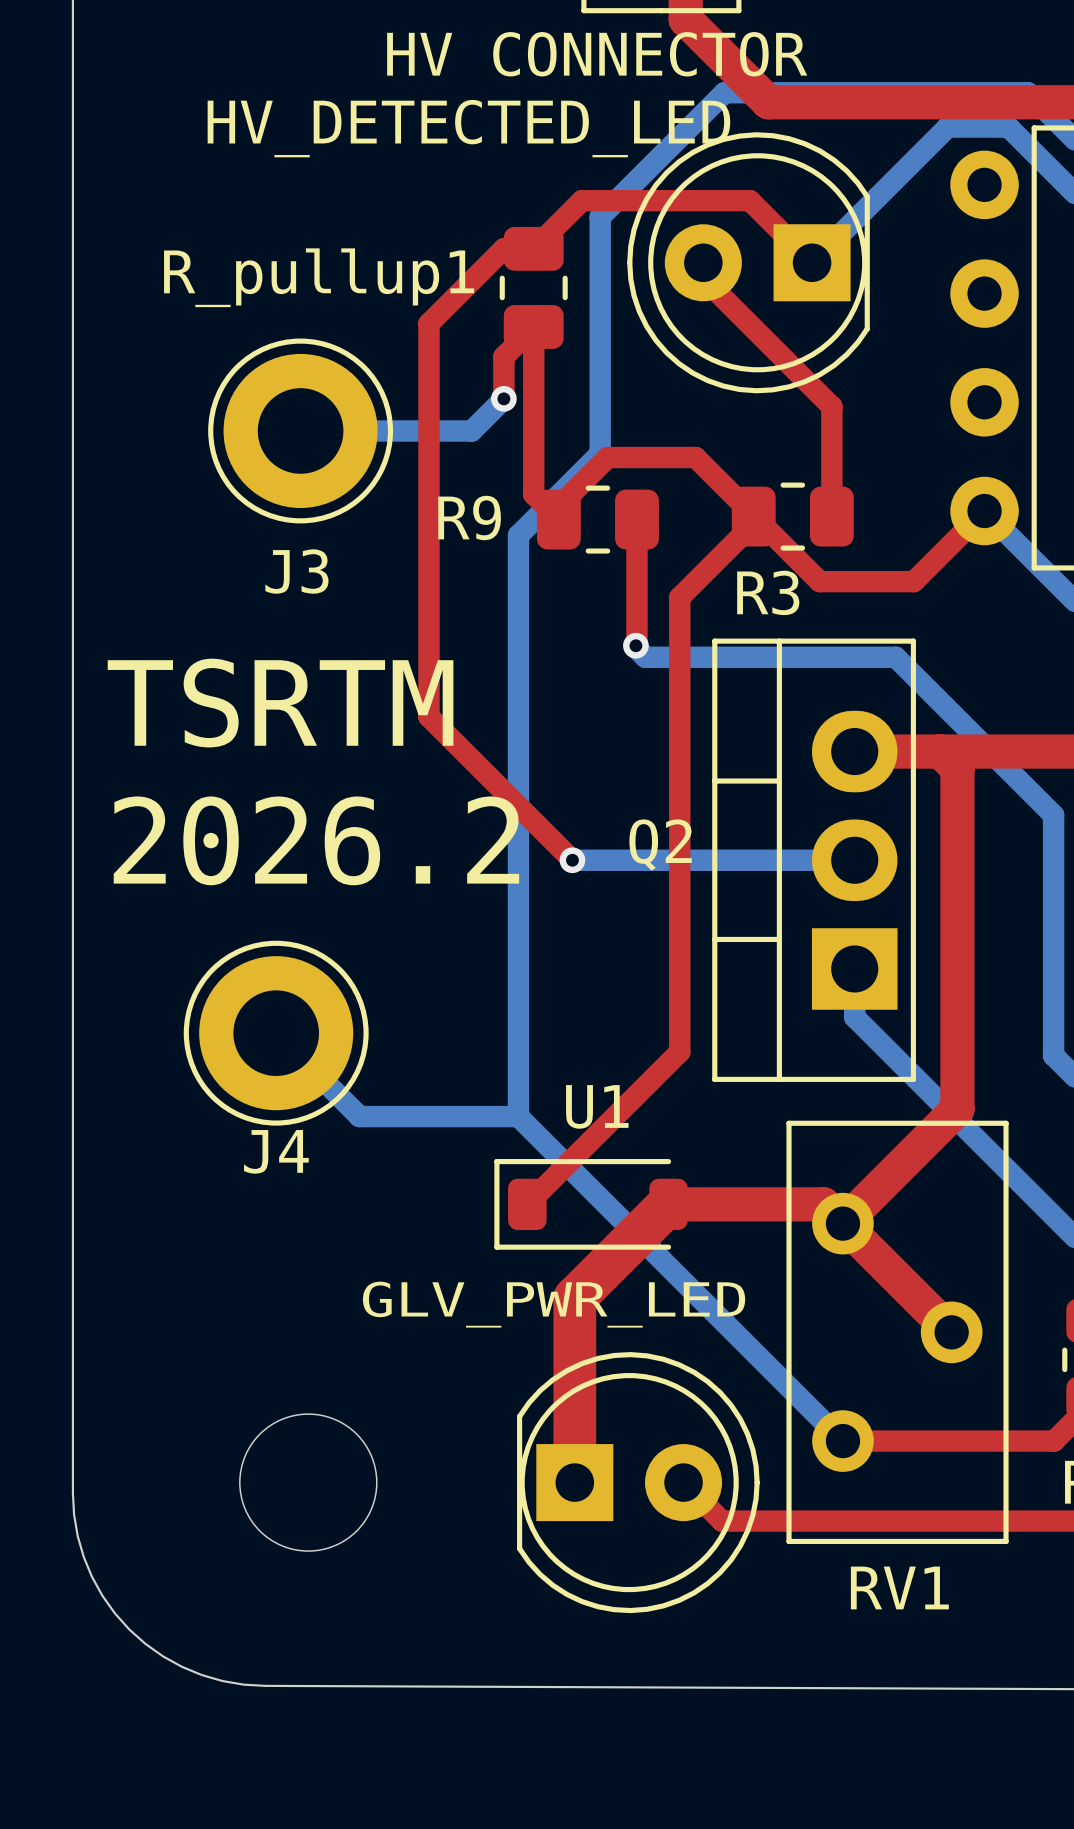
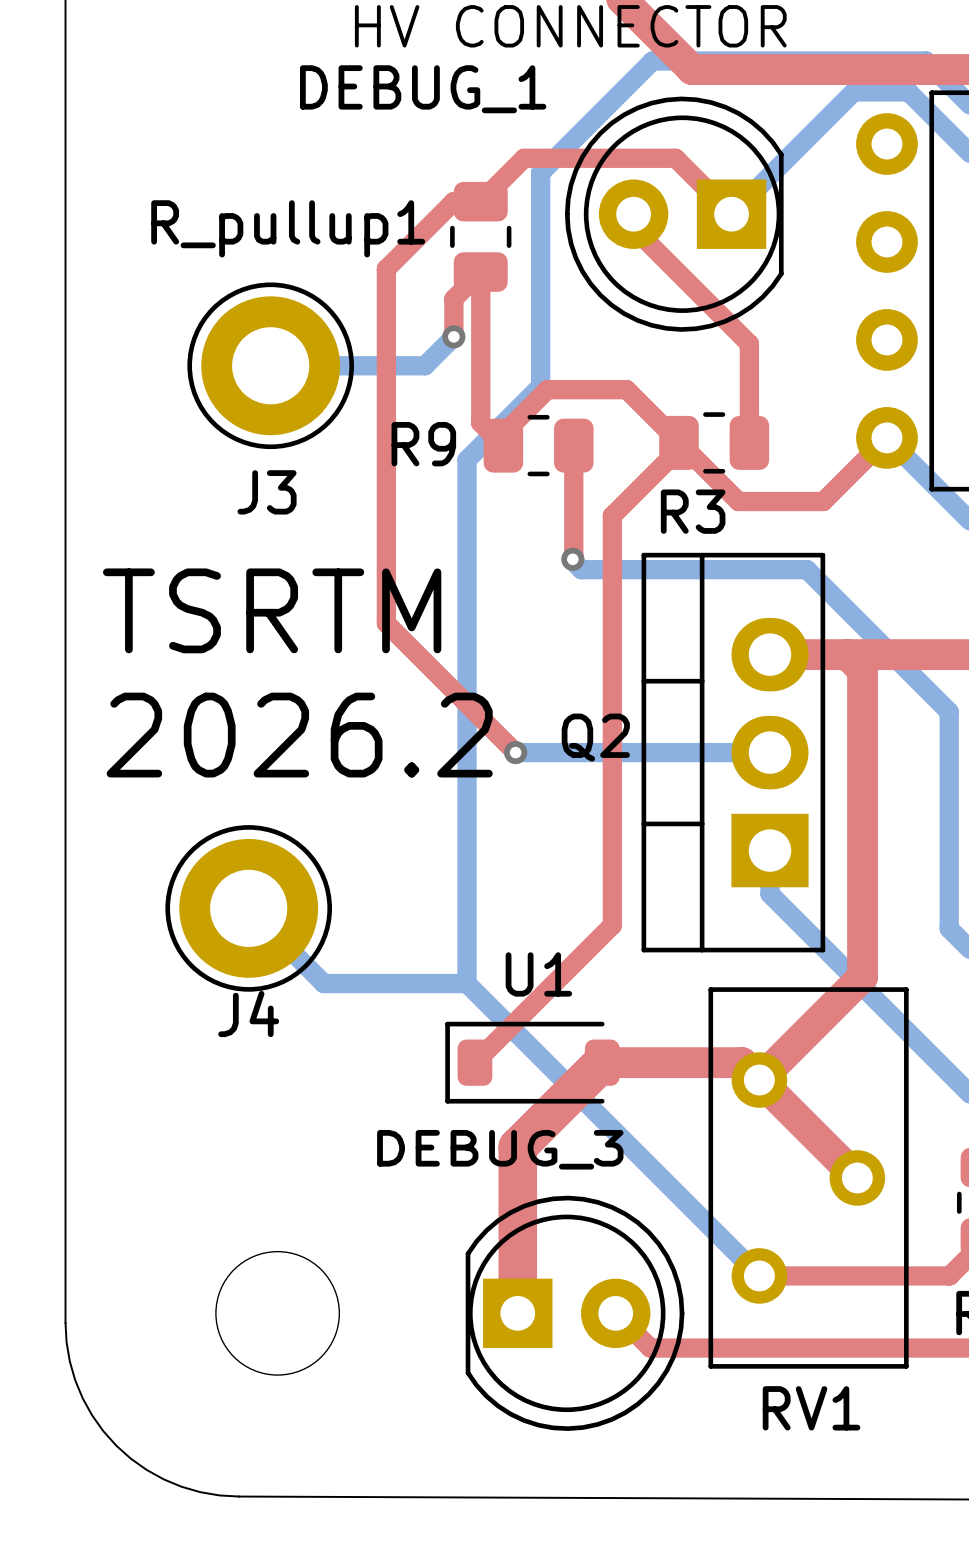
HV_DETECTED_LED name: HV_DETECTED_LED (468, 128) -> DEBUG_1 (423, 89)
GLV_PWR_LED name: GLV_PWR_LED (554, 1304) -> DEBUG_3 (500, 1149)

